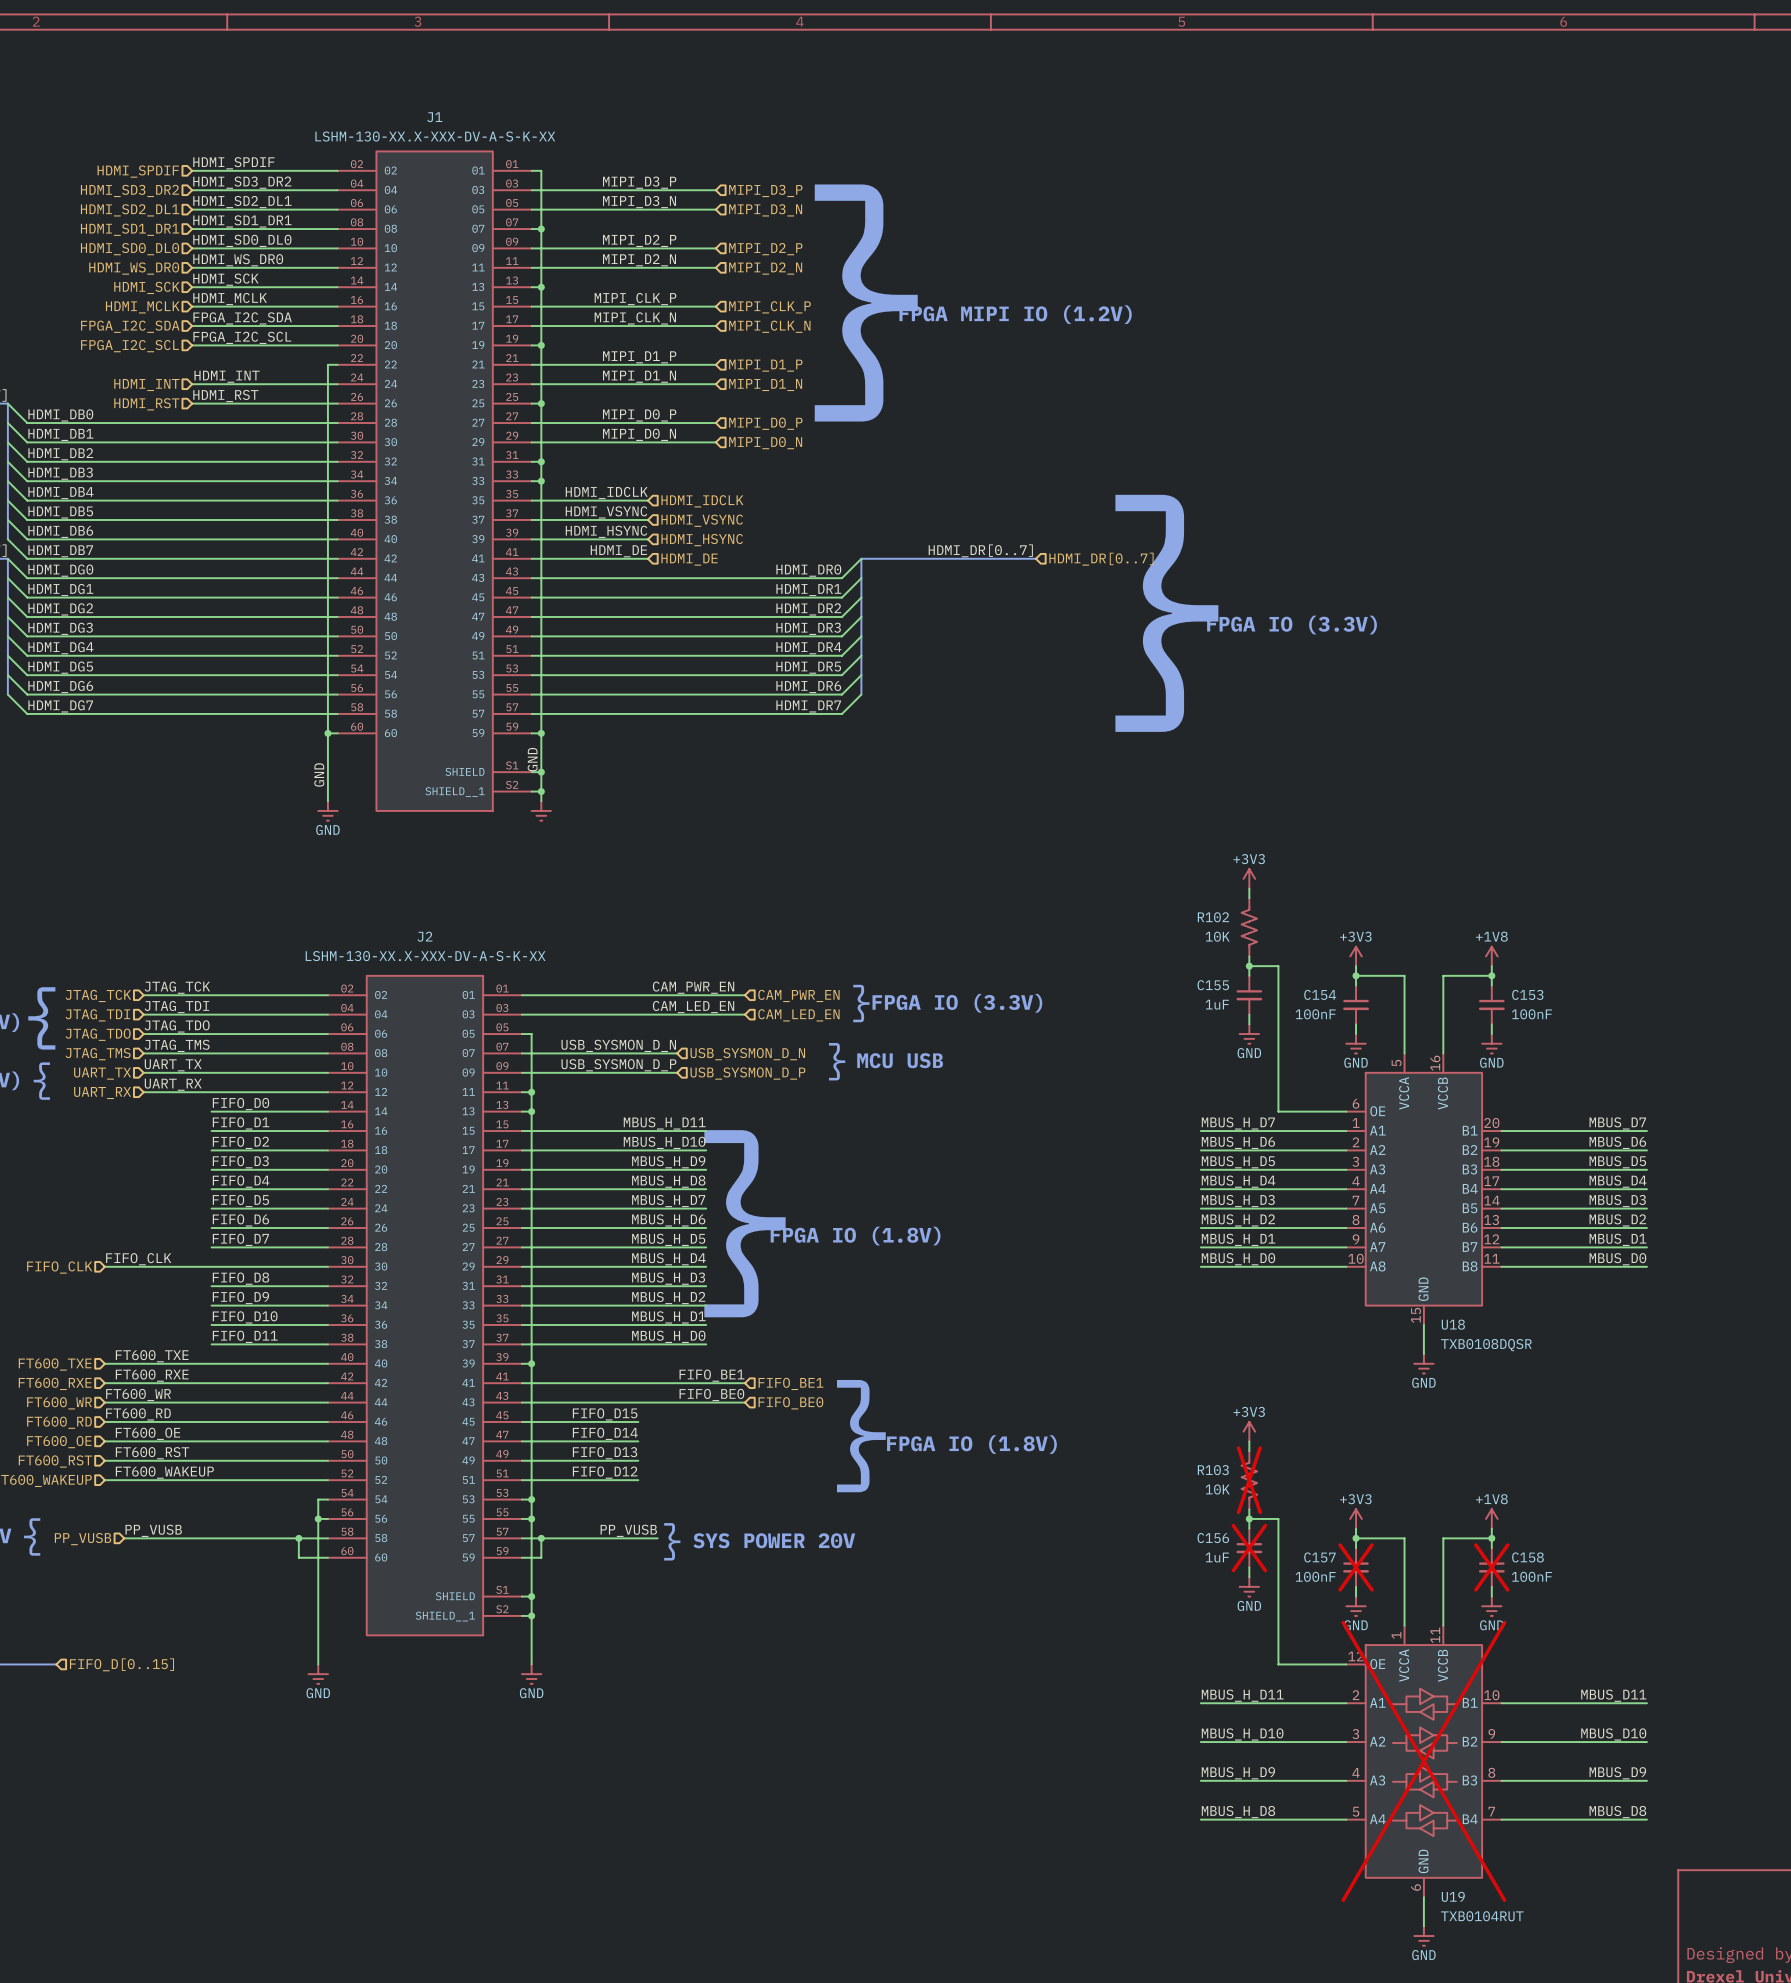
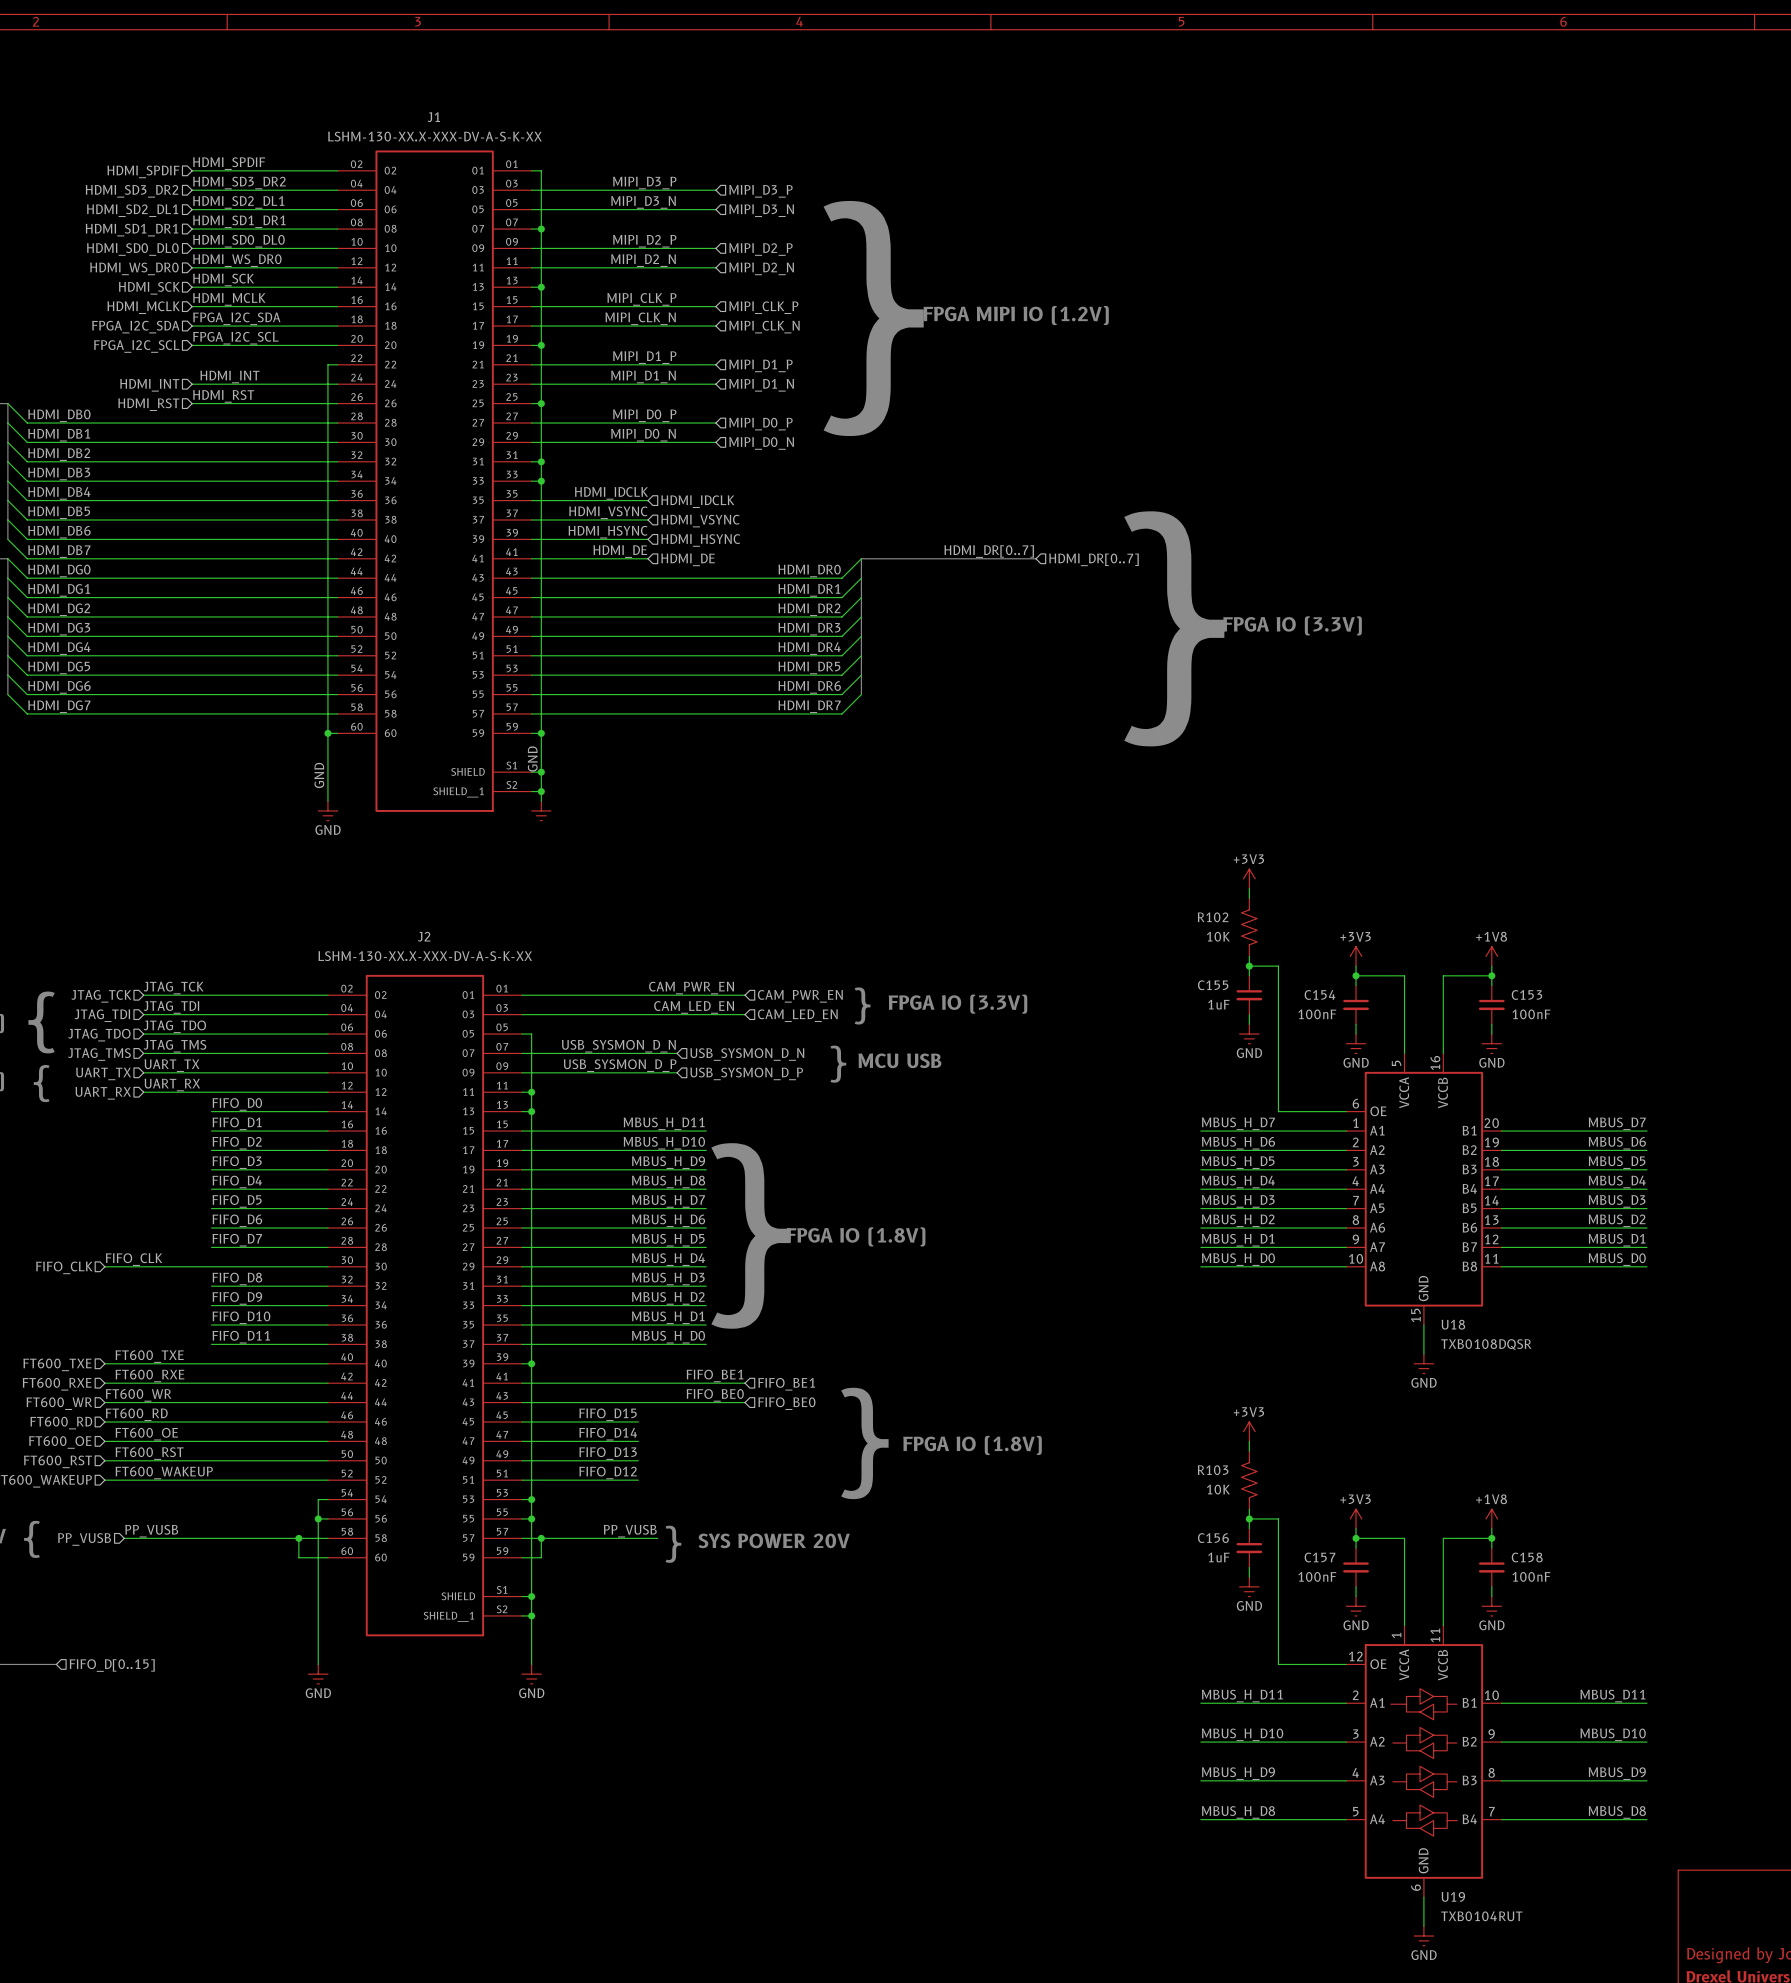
R103 do-not-place cross: (1249, 1480) -> none
C156 do-not-place cross: (1249, 1548) -> none
C157 do-not-place cross: (1356, 1567) -> none
C158 do-not-place cross: (1491, 1567) -> none
U19 do-not-place cross: (1423, 1761) -> none

